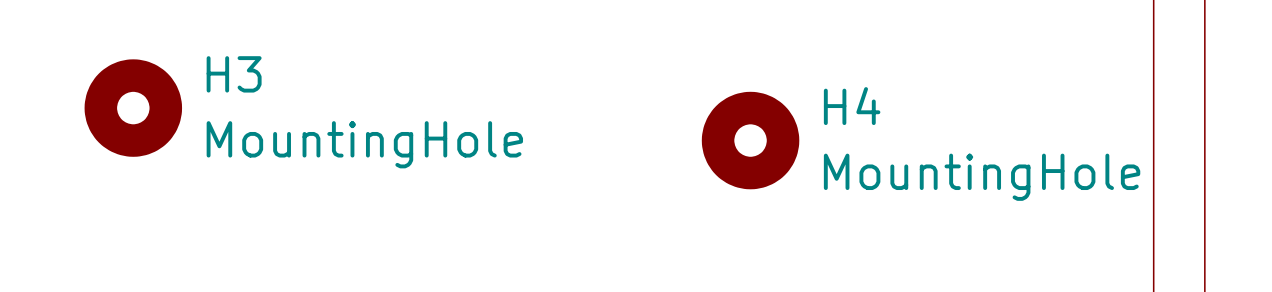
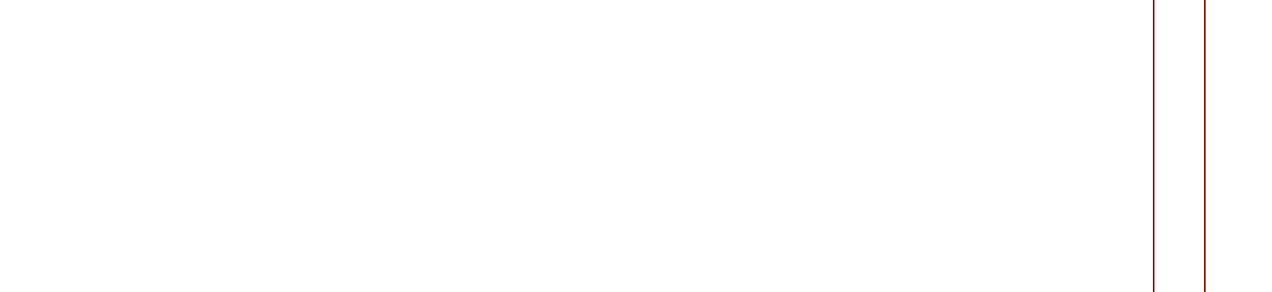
H3: MountingHole (133, 108) -> none
H4: MountingHole (750, 140) -> none

